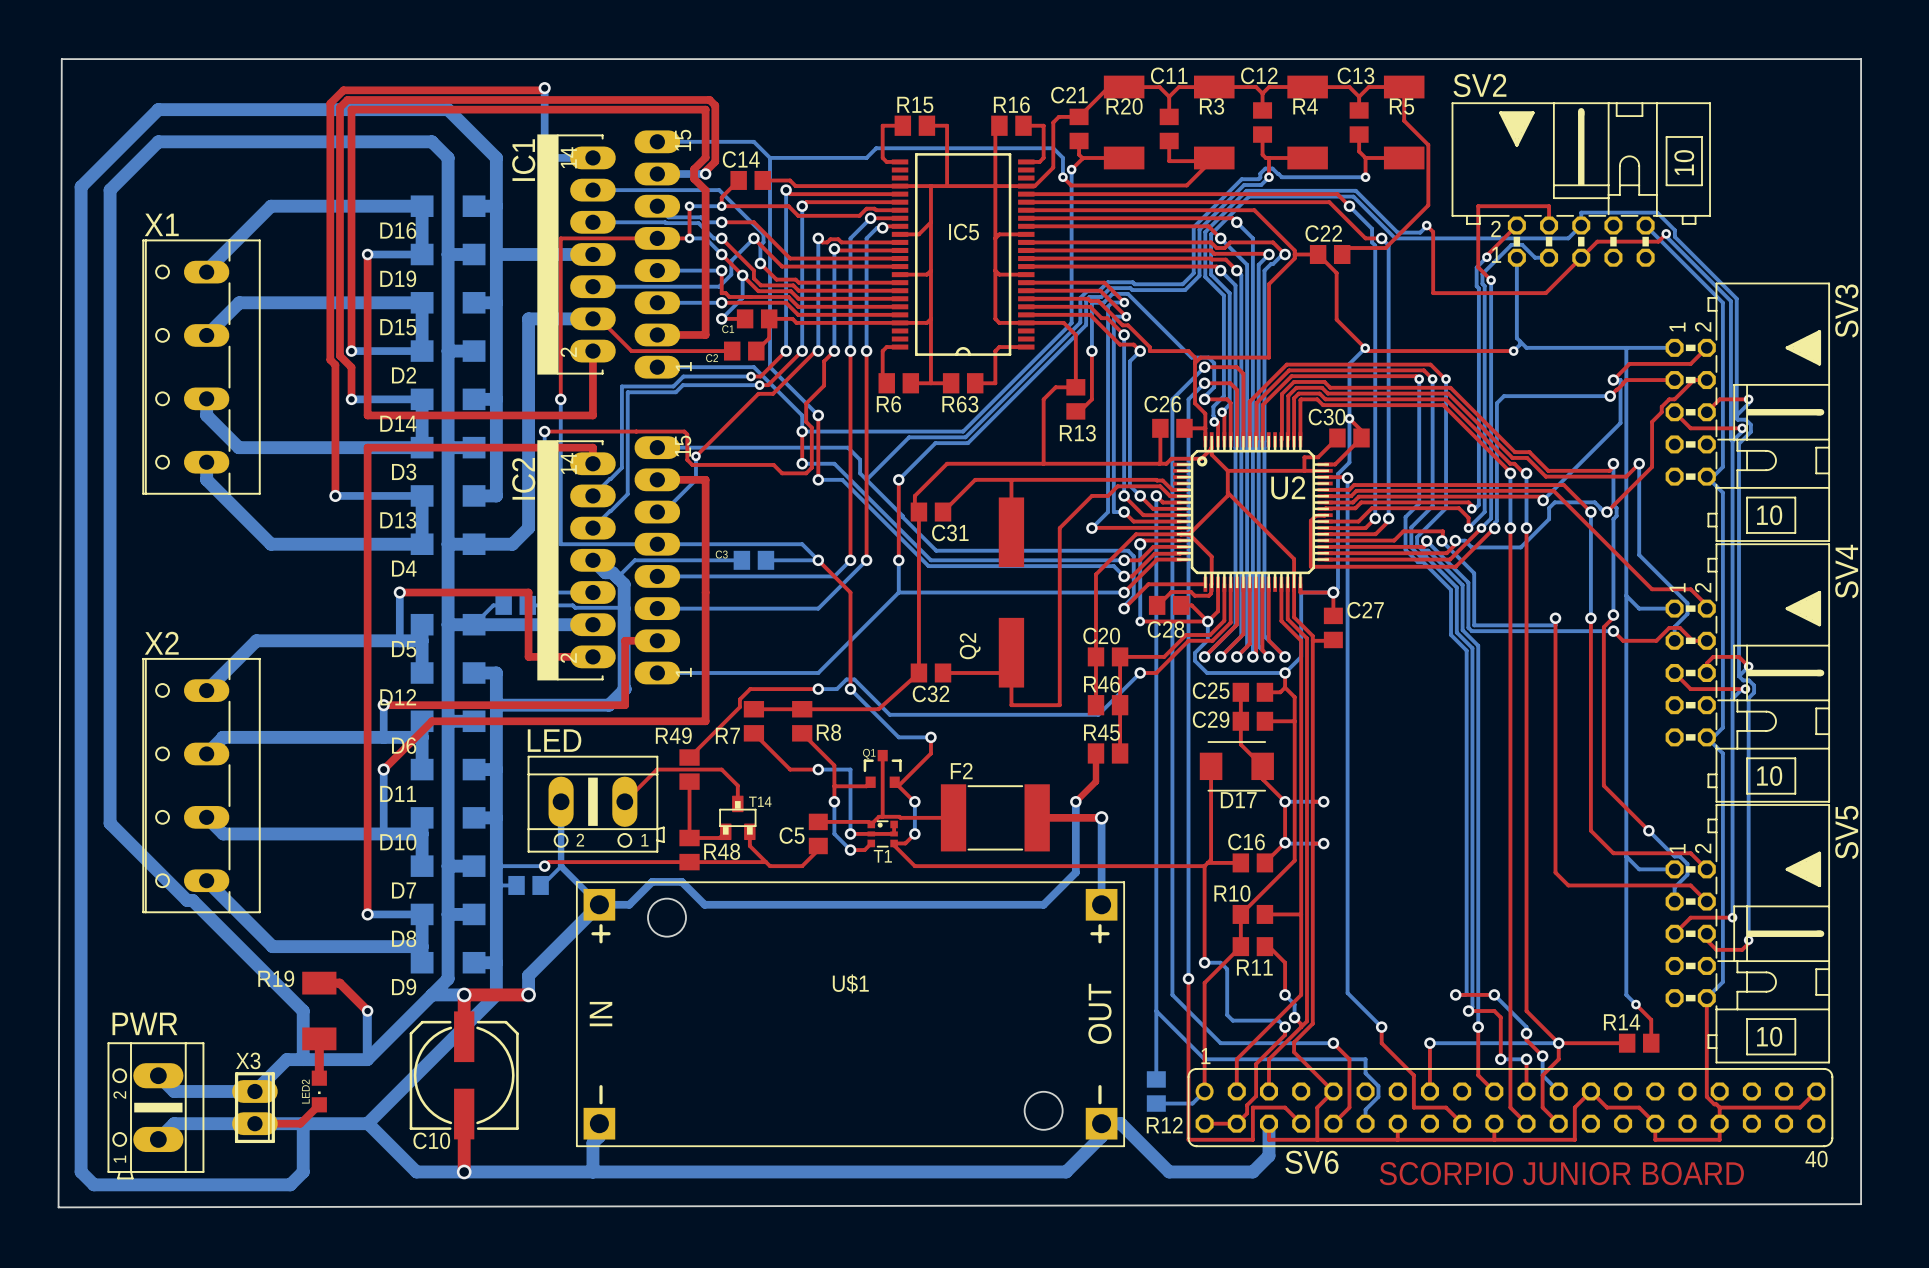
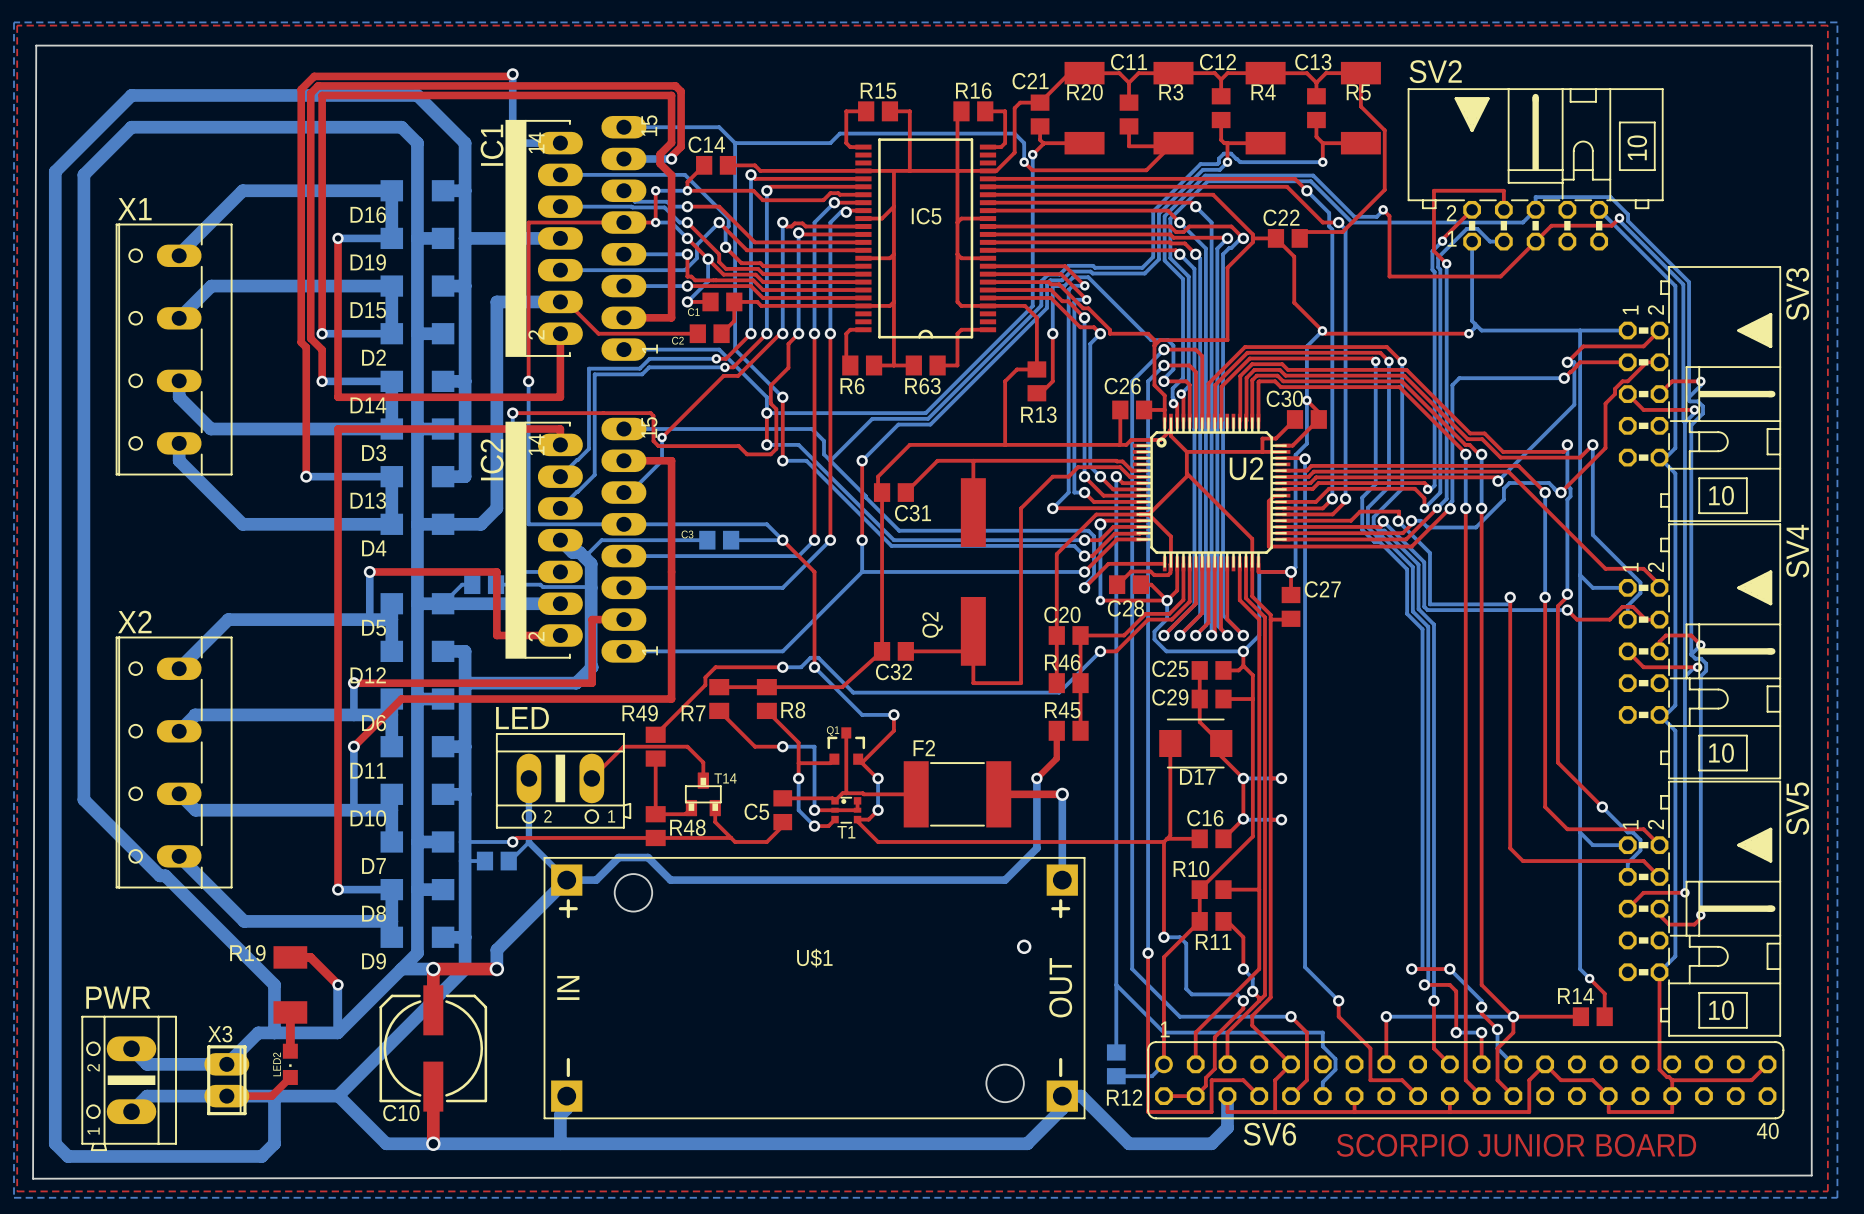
bottom zone outline: none -> (14, 22) (14, 1197) (1837, 1197) (1837, 22) (14, 22)
top zone outline: none -> (17, 25) (17, 1191) (1827, 1191) (1827, 25) (17, 25)
via: none -> (1024, 946)

